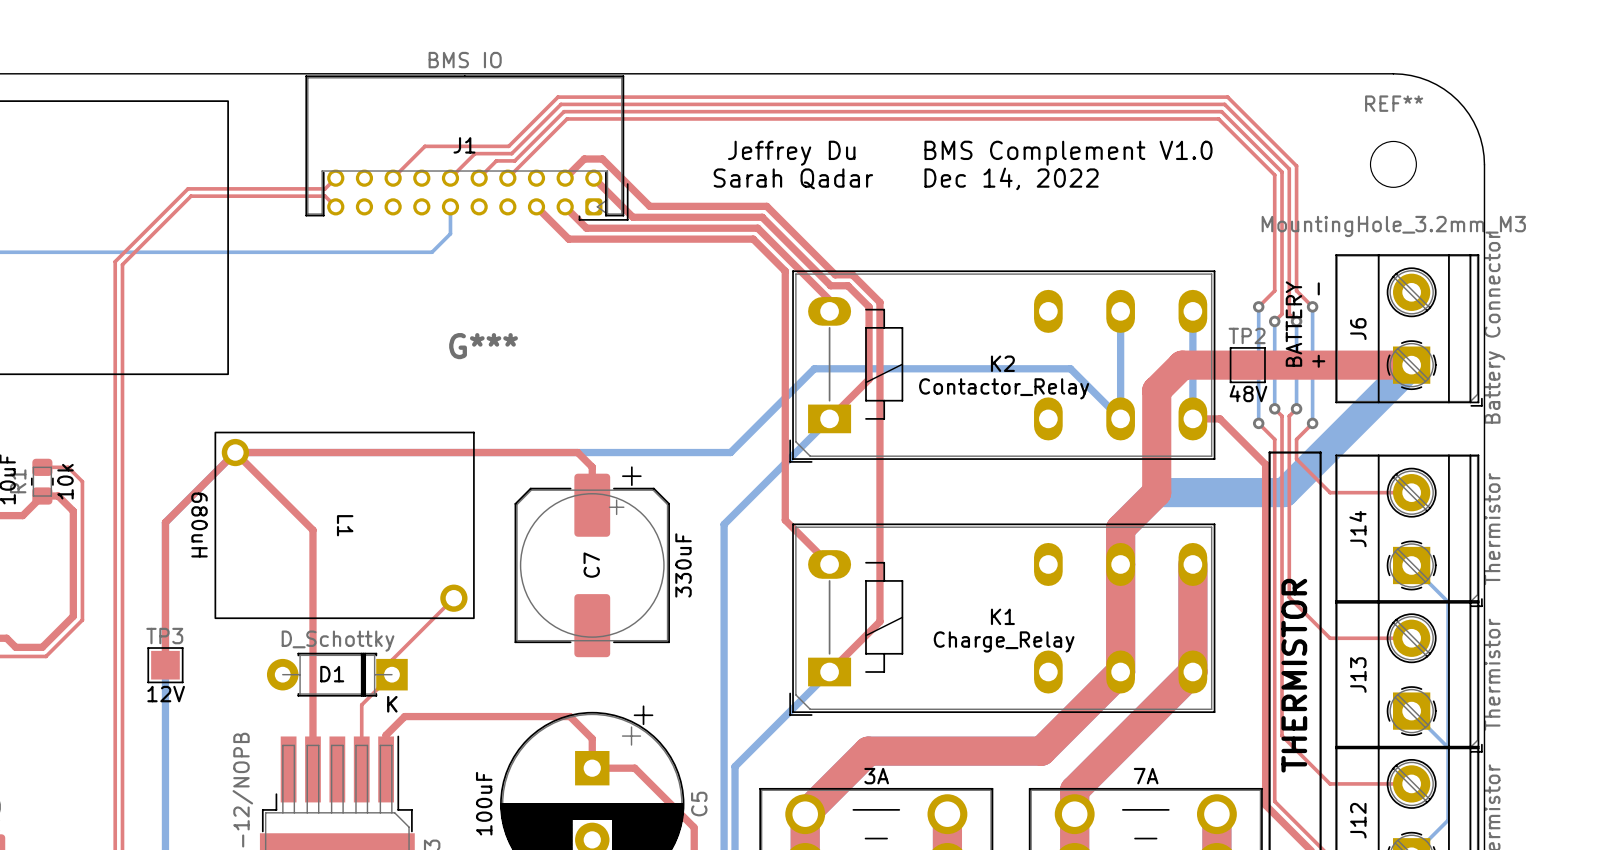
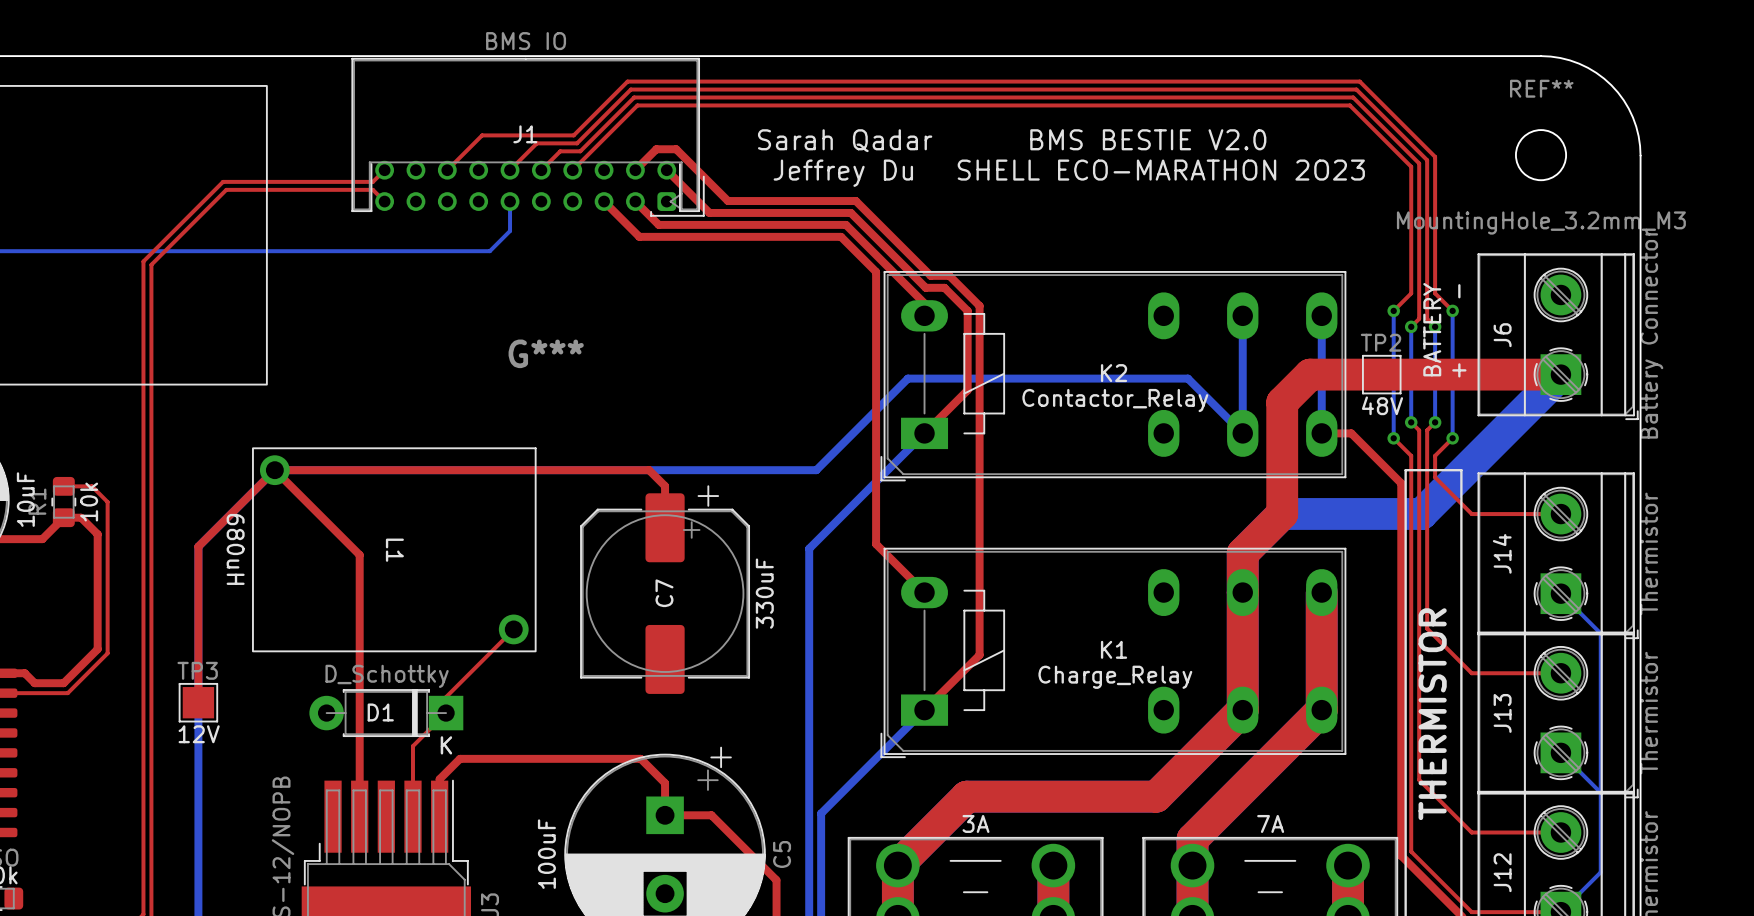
text: none -> BMS BESTIE V2.0 (1148, 139)
text position: Jeffrey Du (791, 153) -> Jeffrey Du (843, 173)
text: BMS Complement V1.0 (1068, 153) -> none
text position: Sarah Qadar (793, 178) -> Sarah Qadar (845, 140)
text: Dec 14, 2022 (1011, 178) -> none
text: none -> SHELL ECO-MARATHON 2O23 (1161, 170)

